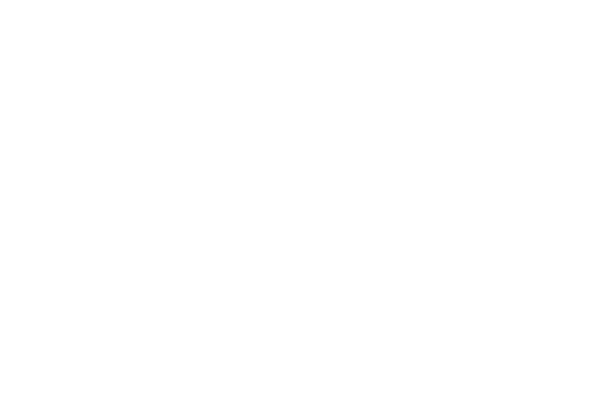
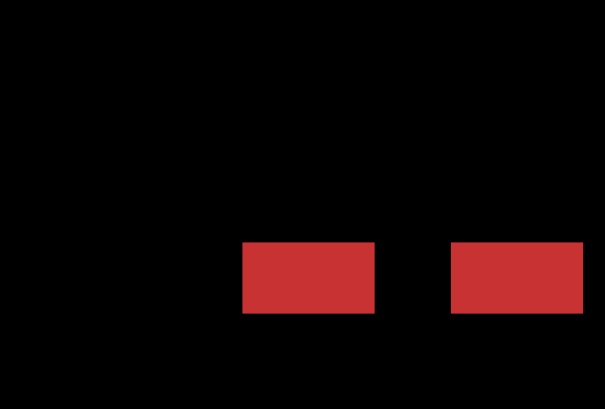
part: none -> (412, 278)

